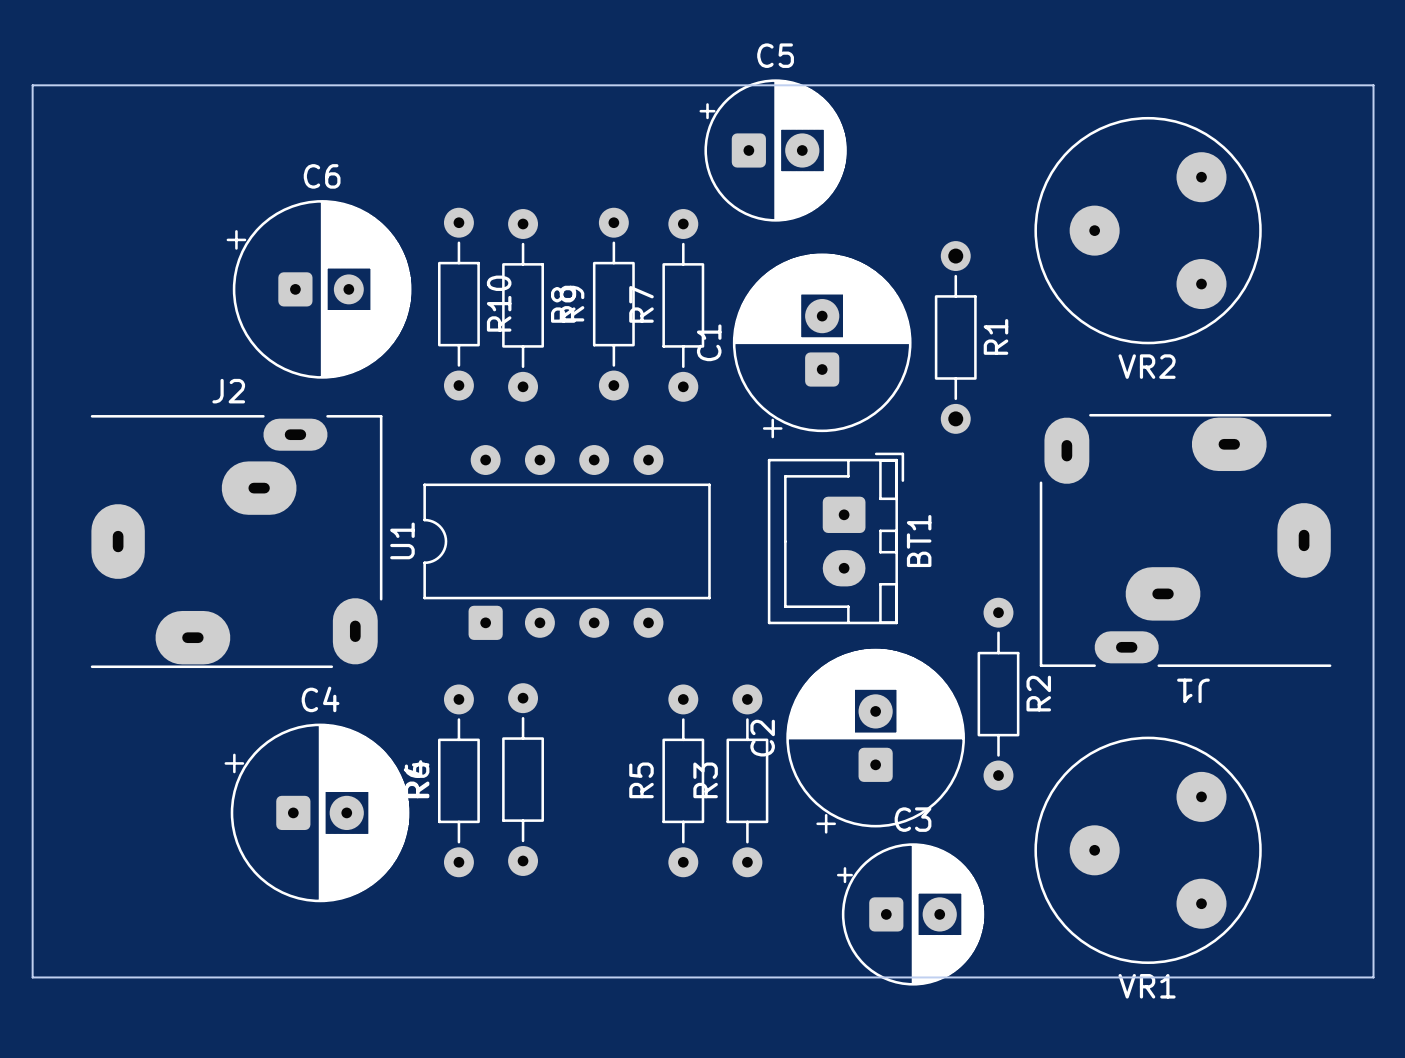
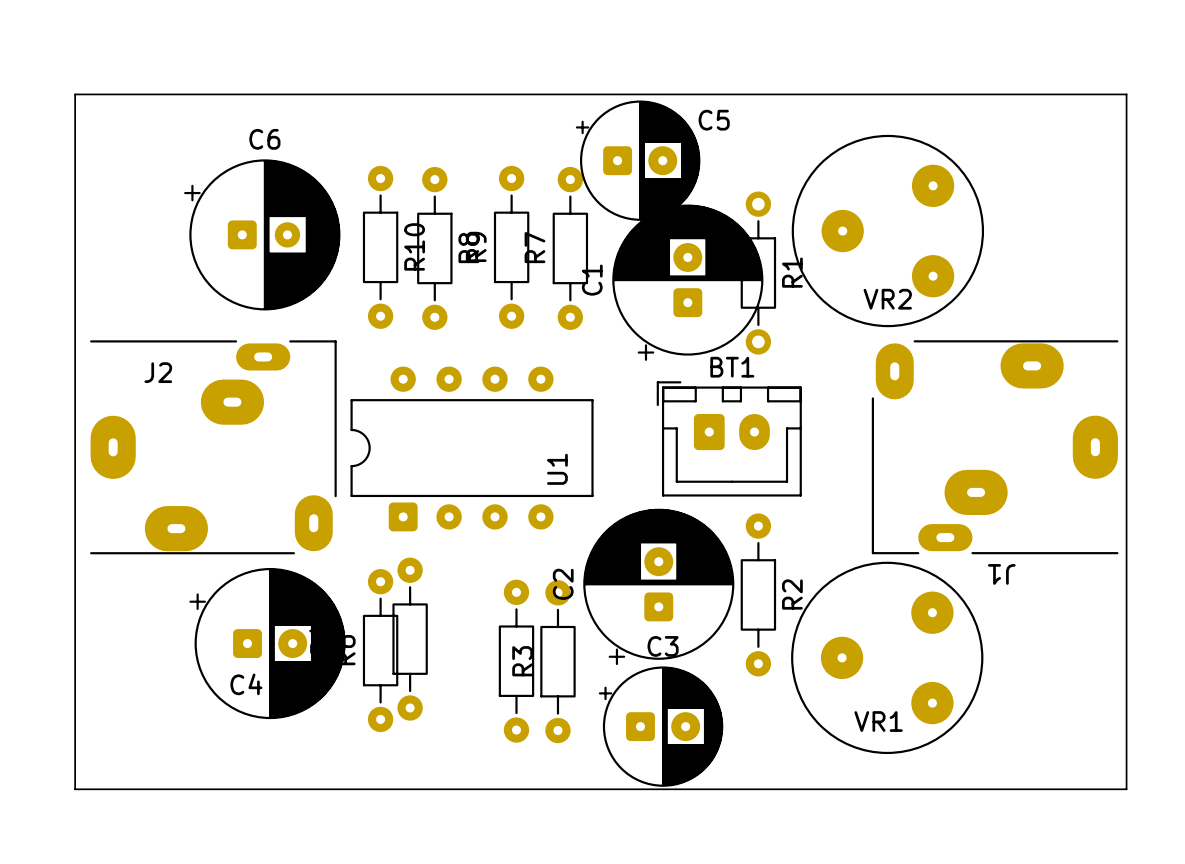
C5 name position: C5 (775, 55) -> C5 (714, 120)
board edge: (32, 85) (1373, 85) (1373, 977) (32, 977) (32, 85) -> (75, 94) (75, 789) (1126, 789) (1126, 94) (75, 94)
C5 position: (773, 150) -> (638, 160)
VR2 position: (1148, 230) -> (887, 231)
R1 position: (955, 337) -> (758, 273)
VR2 name position: VR2 (1147, 366) -> VR2 (887, 299)
J2 name position: J2 (228, 391) -> J2 (158, 372)
BT1 rotation: 0° (835, 538) -> 90° counterclockwise (729, 438)
U1 name position: U1 (402, 540) -> U1 (557, 469)
J2 position: (236, 541) -> (213, 447)
R2 position: (998, 694) -> (758, 594)
C4 name position: C4 (320, 699) -> C4 (246, 684)
C2 position: (875, 741) -> (658, 586)
part position: (523, 779) -> (410, 639)
R5: (683, 780) -> none
R3 position: (747, 780) -> (557, 661)
part: none -> (516, 661)
C4 position: (316, 812) -> (267, 643)
VR1 position: (1148, 850) -> (887, 657)
C3 position: (910, 914) -> (661, 726)
VR1 name position: VR1 (1147, 986) -> VR1 (878, 721)

